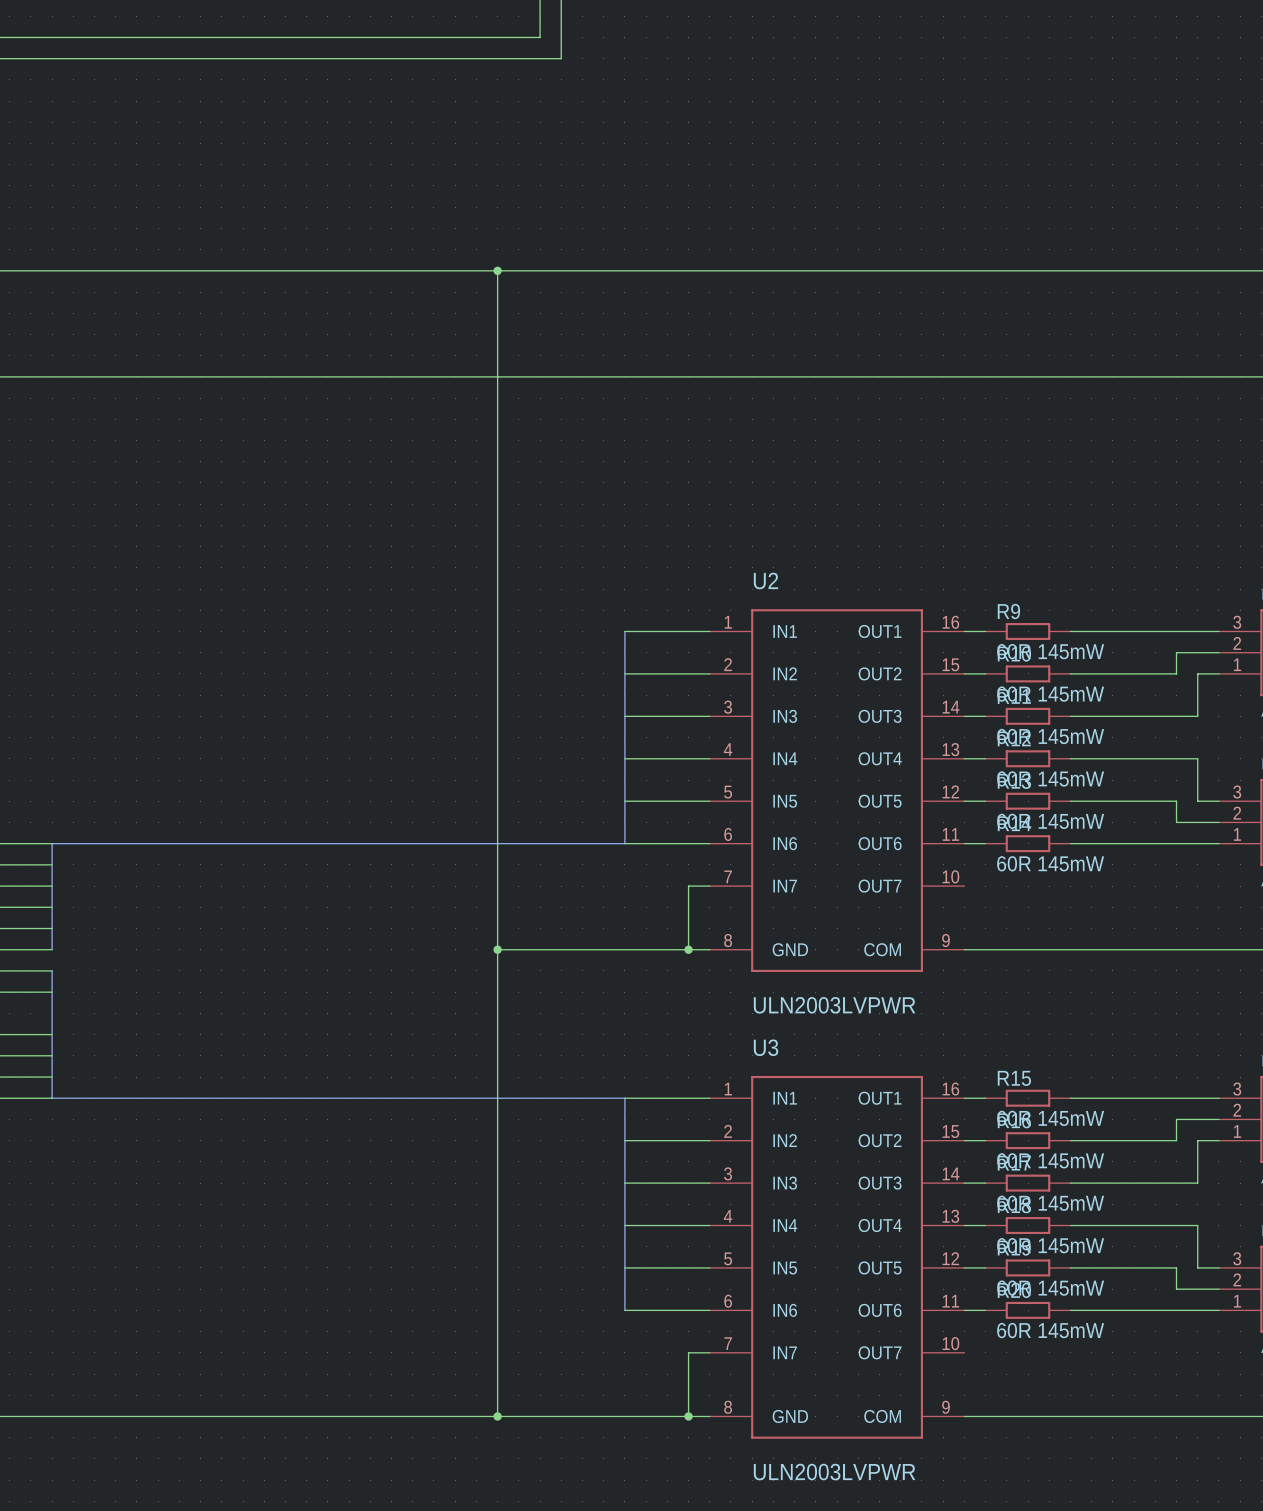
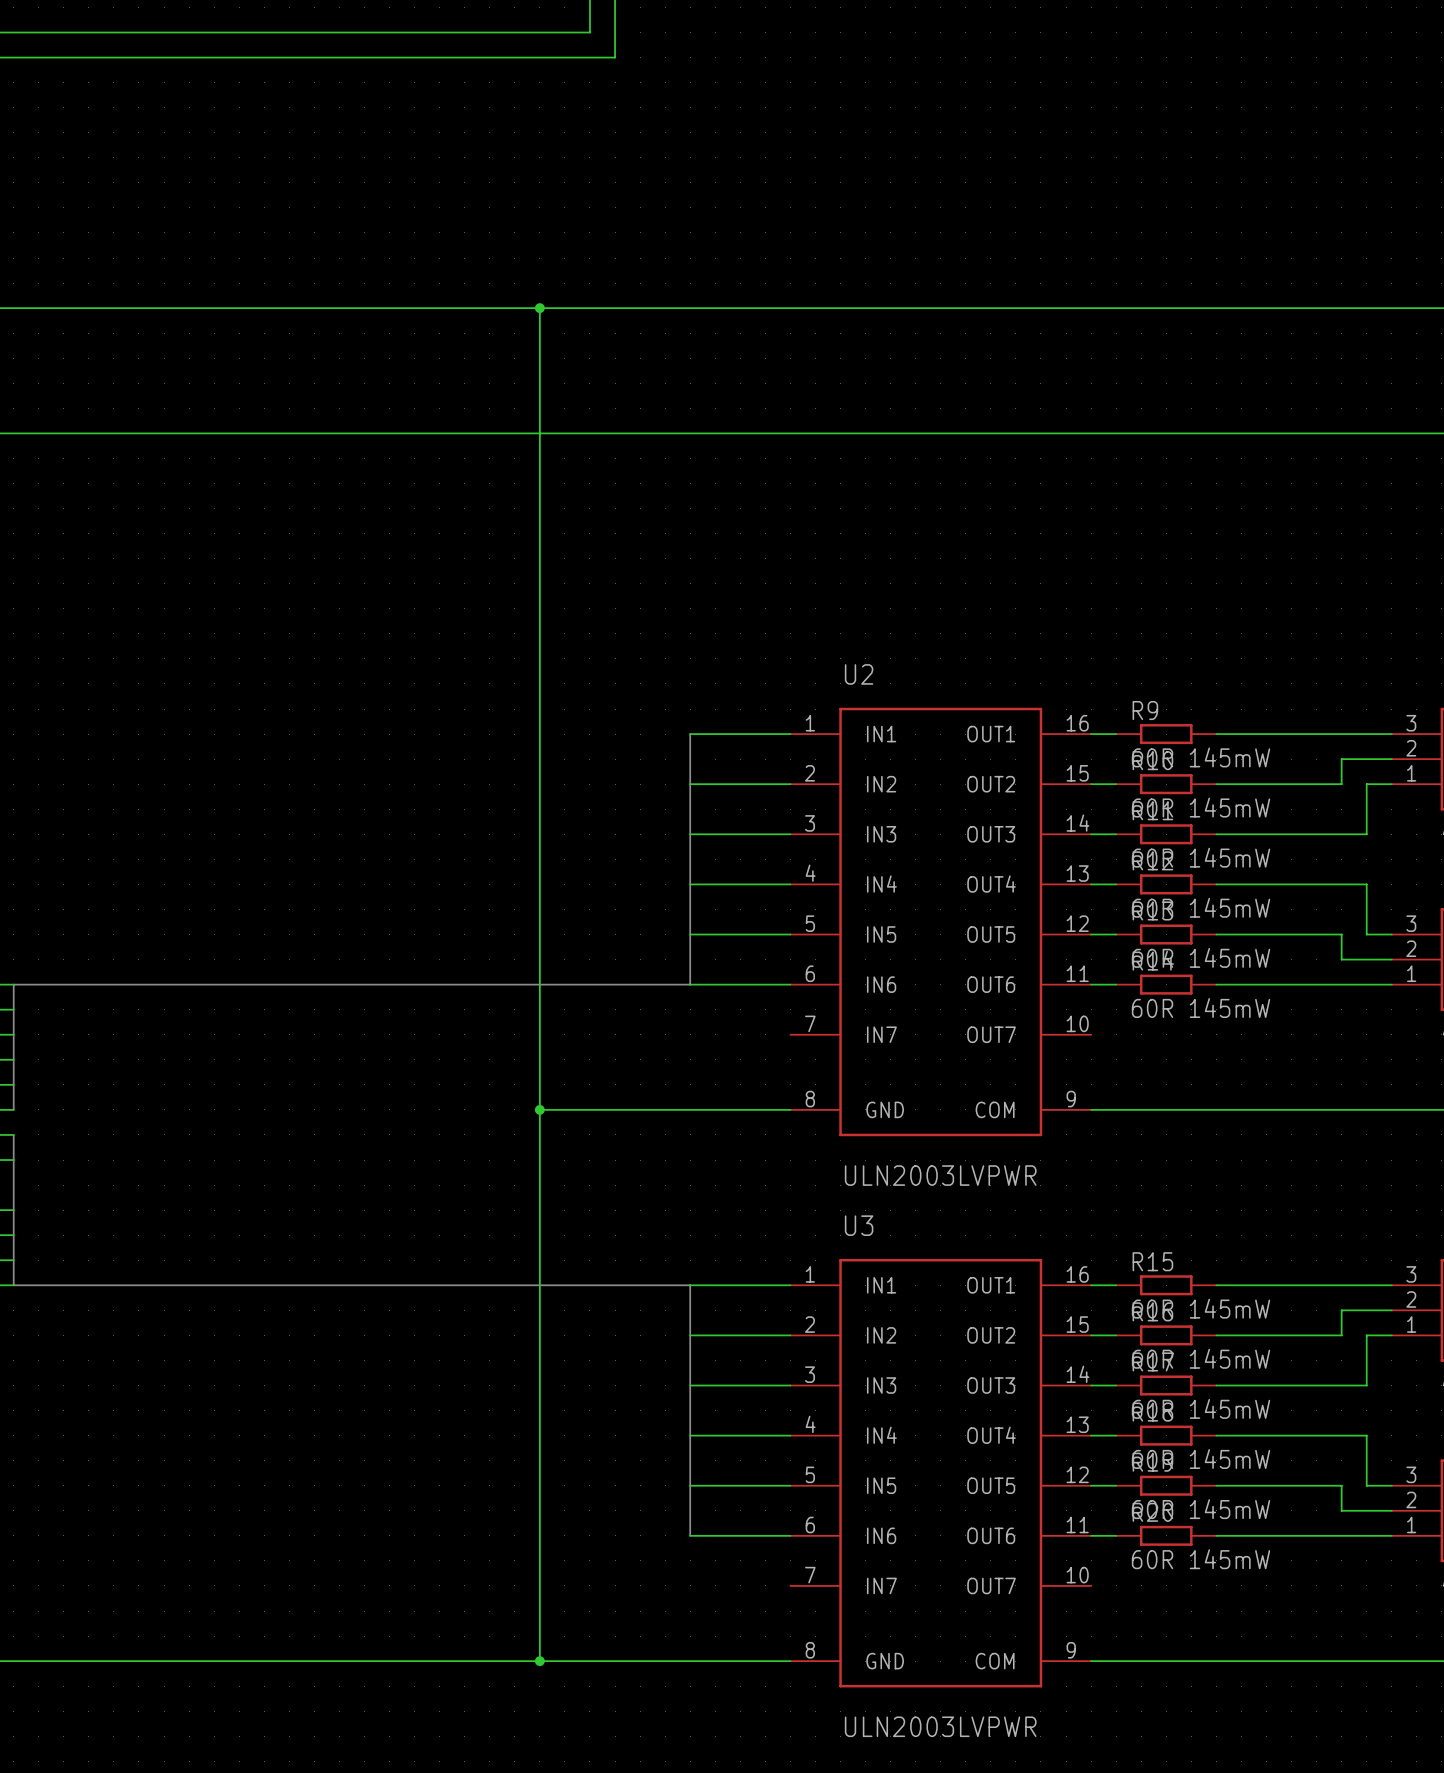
wire: (709, 886) (688, 886) (688, 949) -> none
junction: (688, 949) -> none
wire: (709, 1352) (688, 1352) (688, 1416) -> none
junction: (688, 1416) -> none

